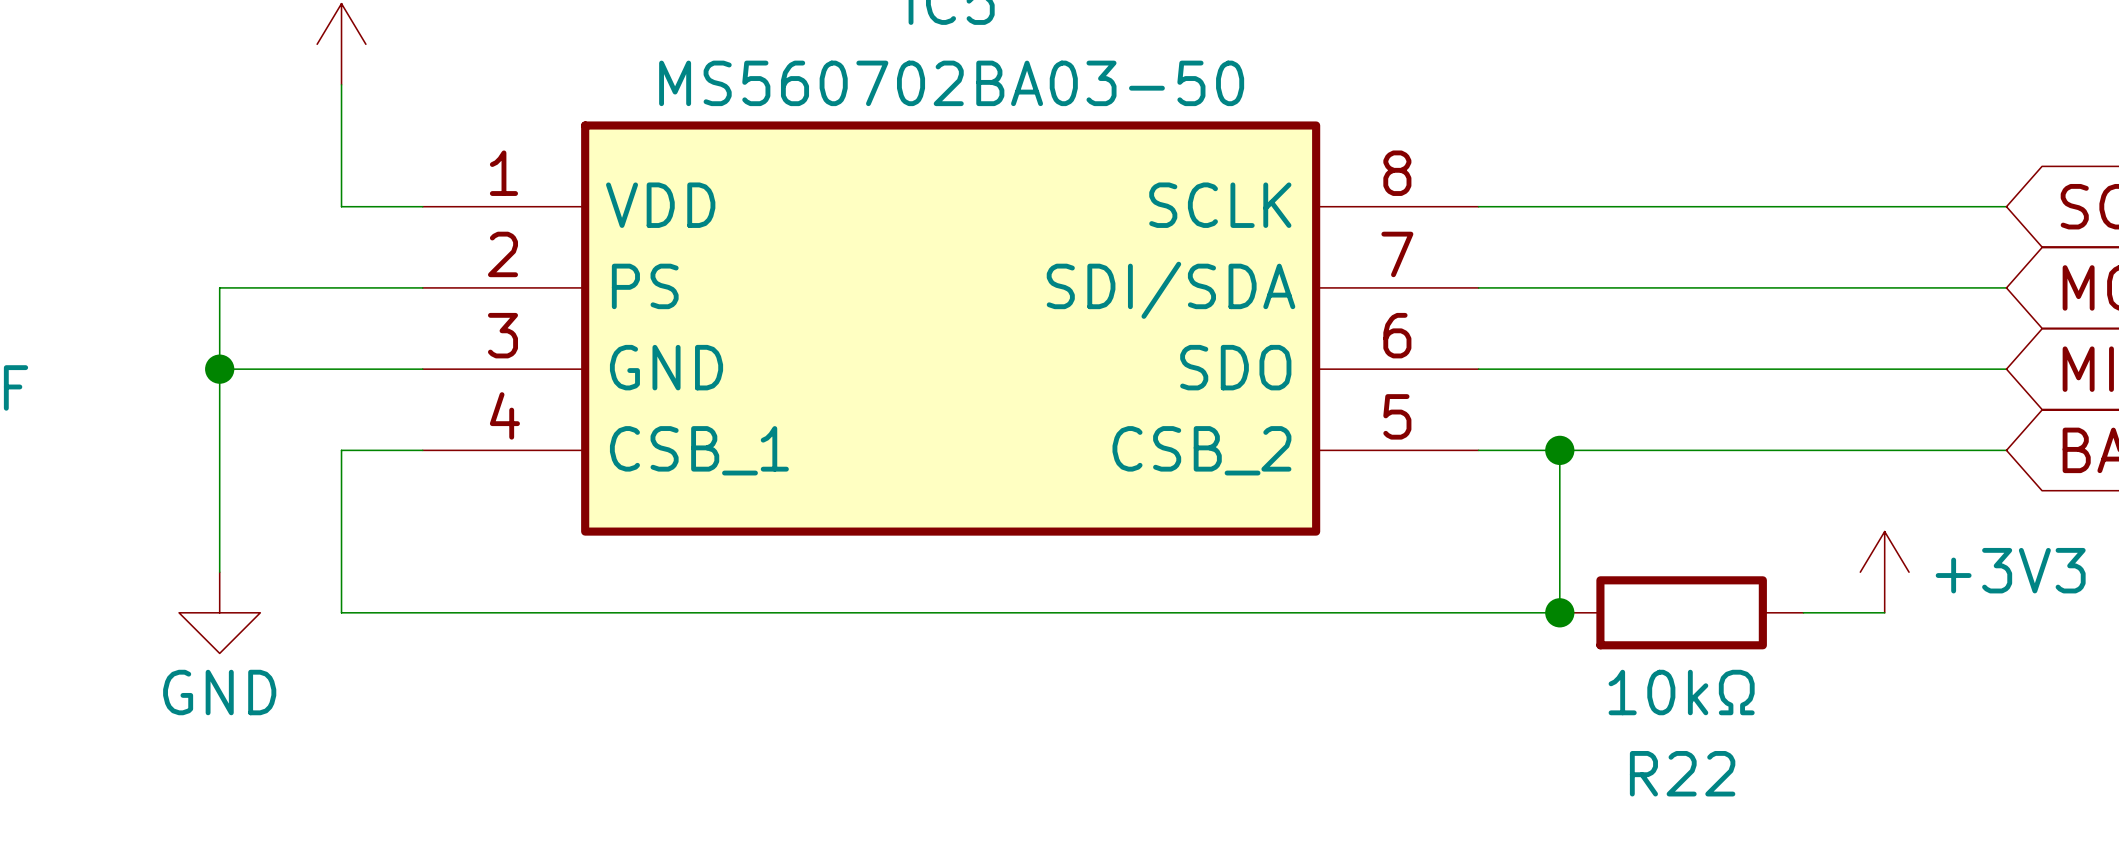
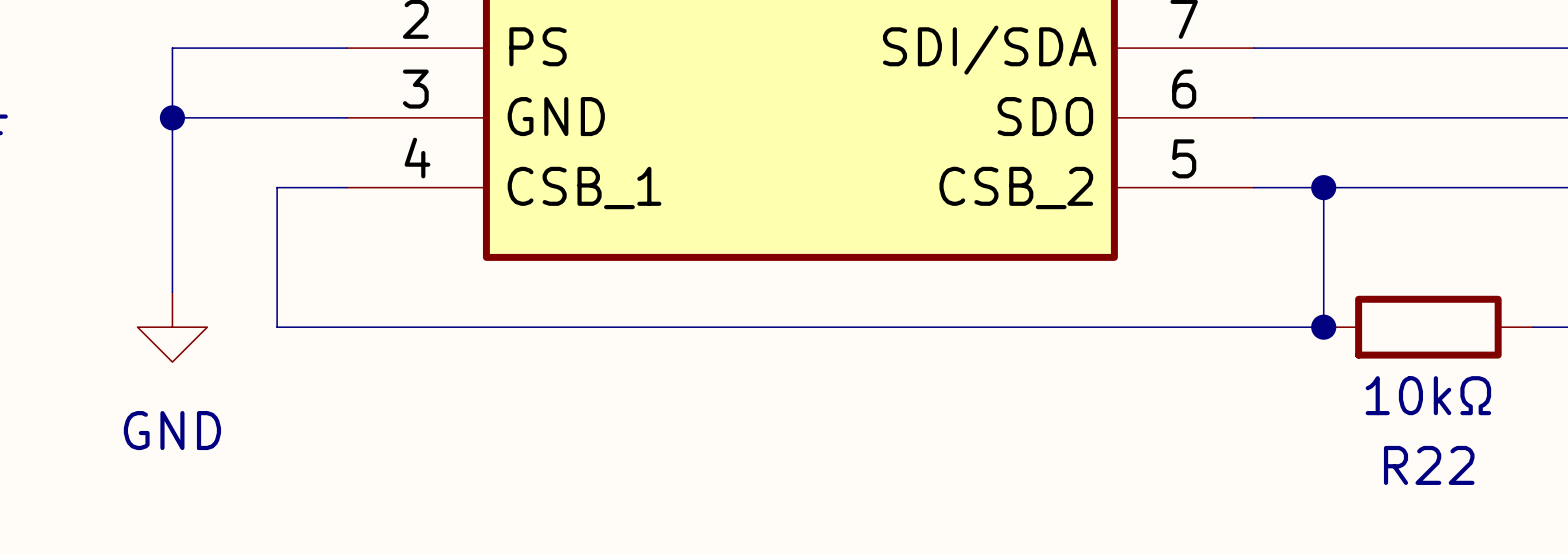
power symbol text position: GND (219, 692) -> GND (172, 430)

